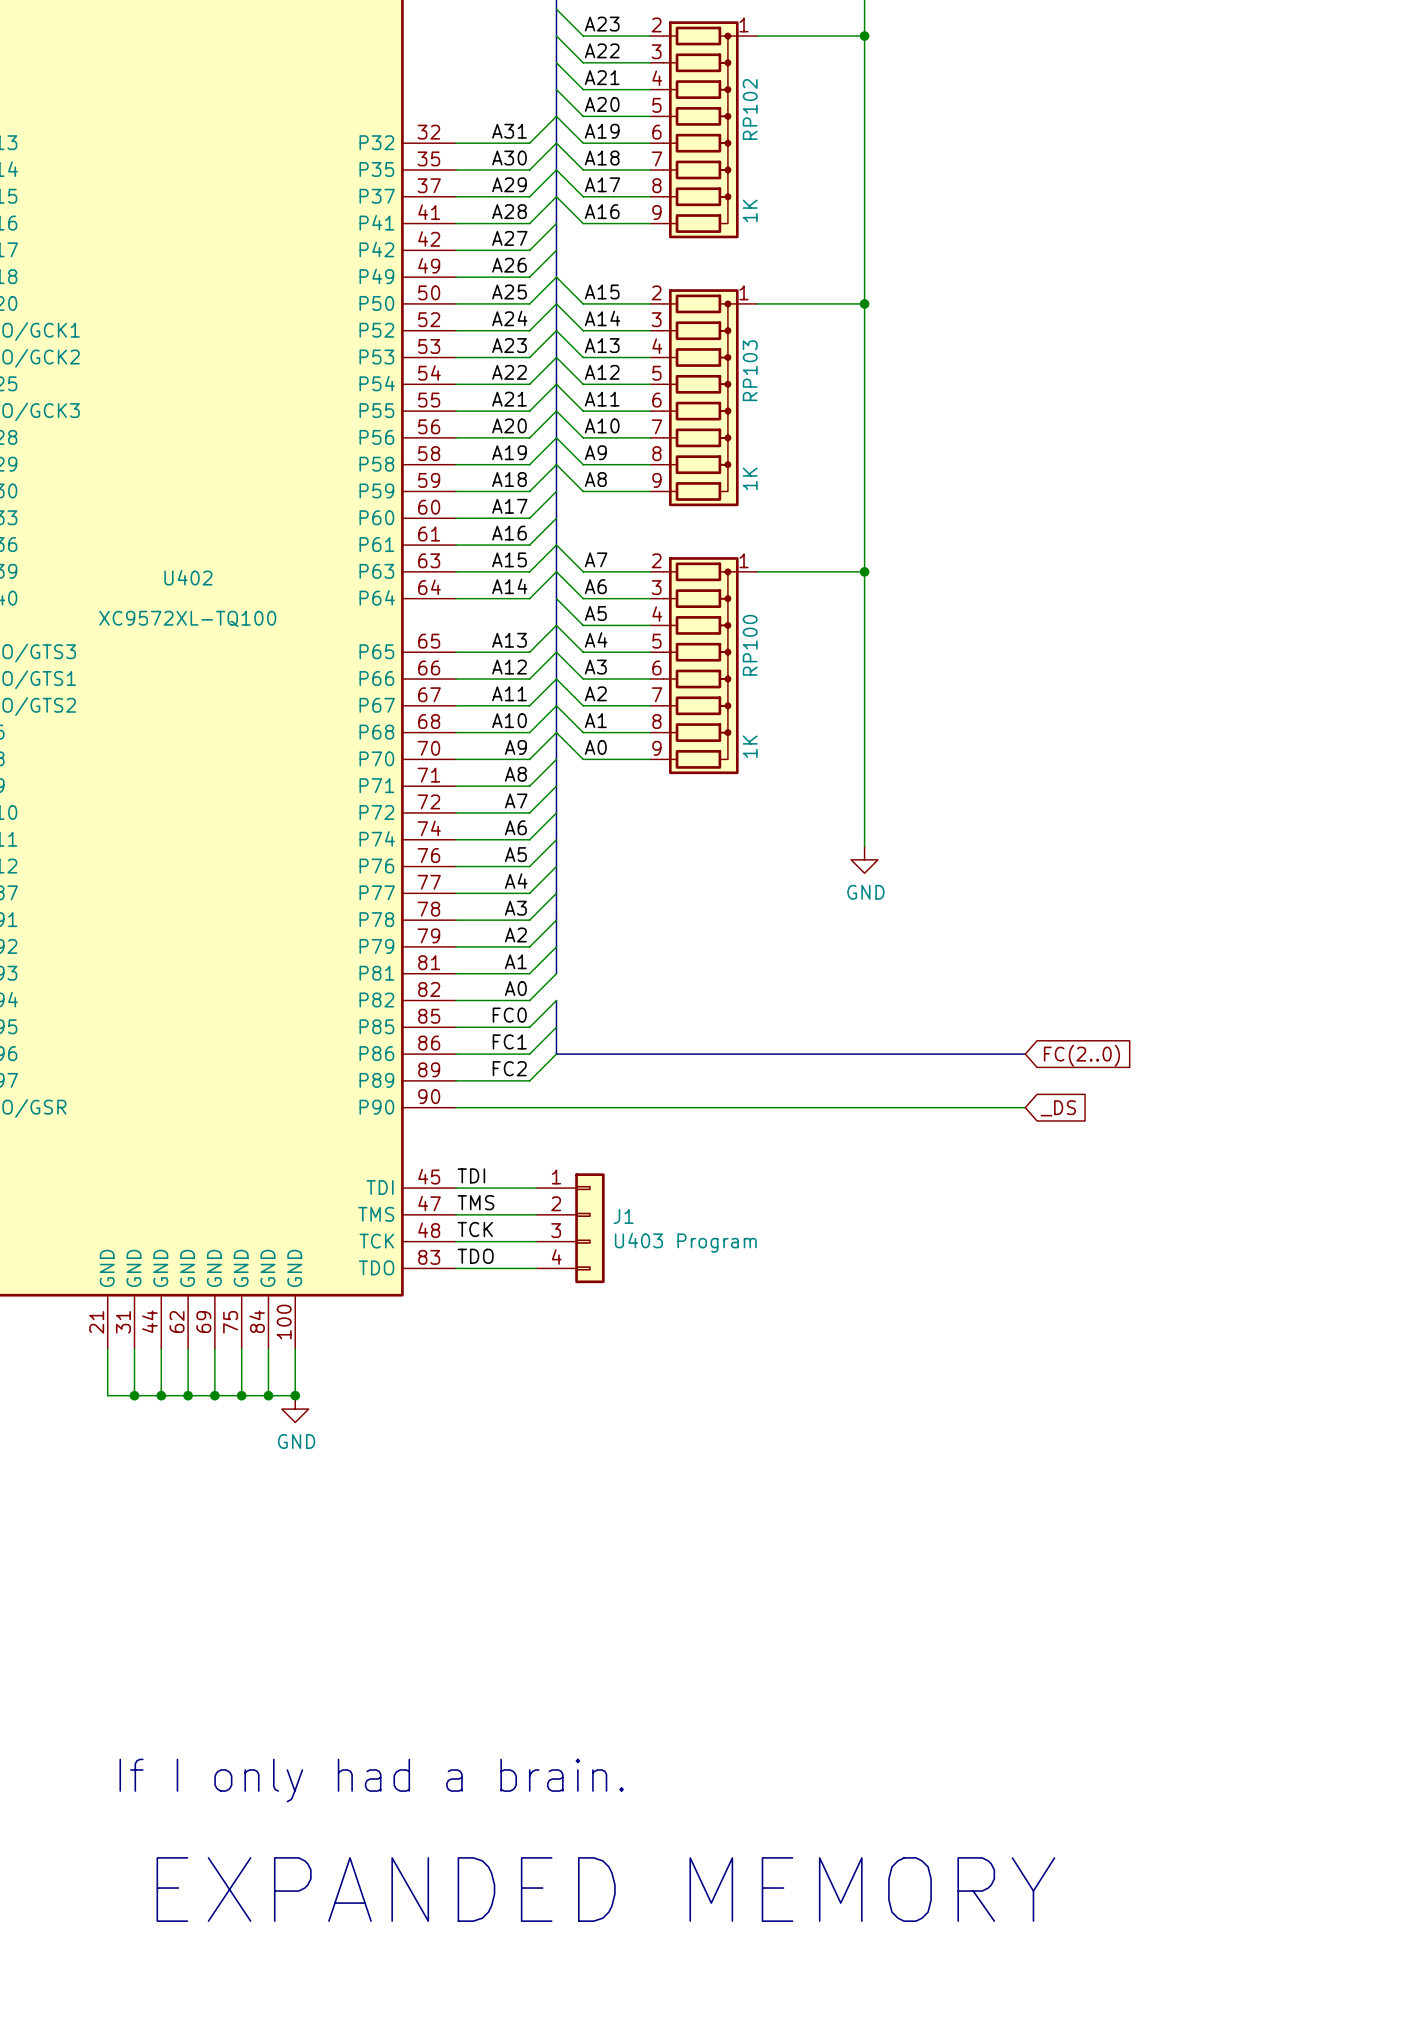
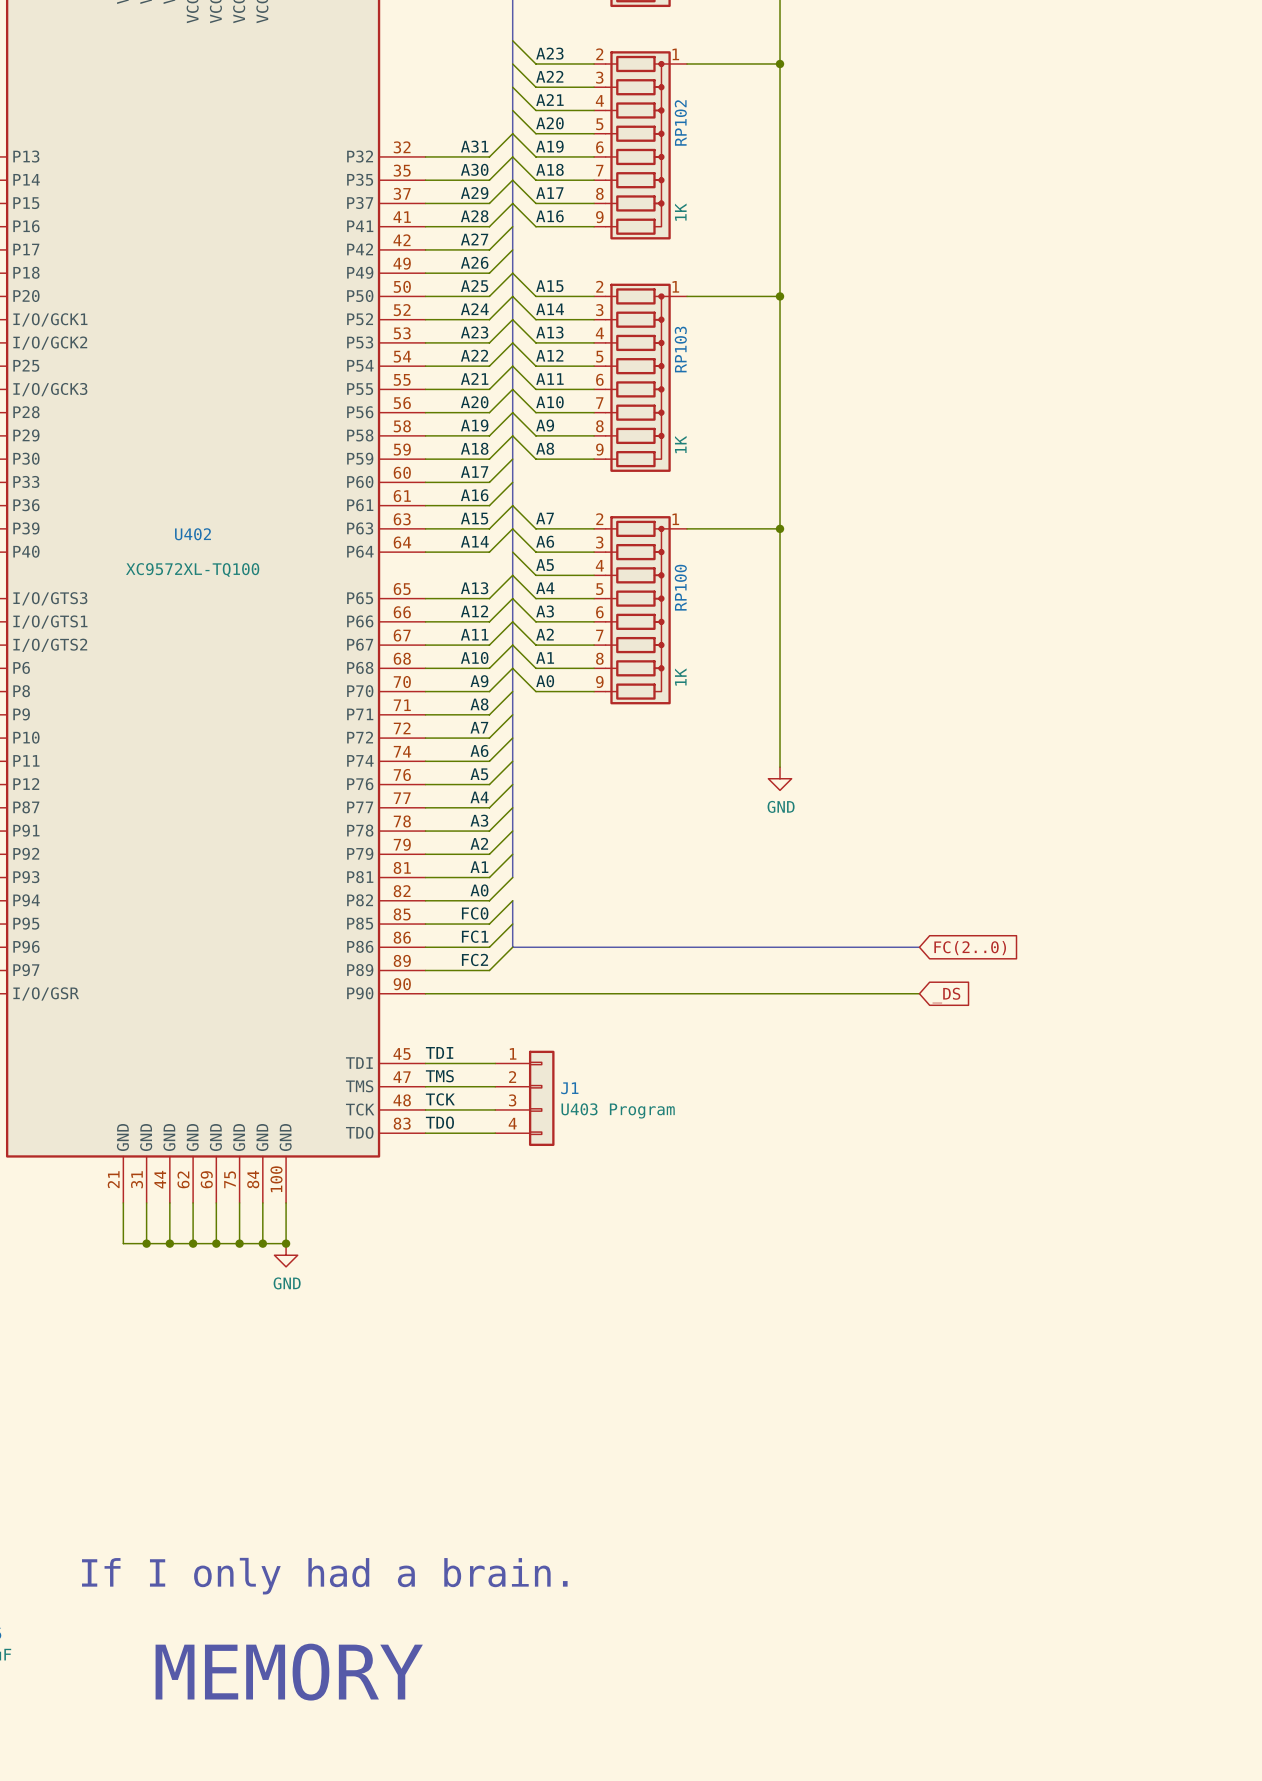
text: EXPANDED MEMORY (605, 1889) -> MEMORY (289, 1672)

